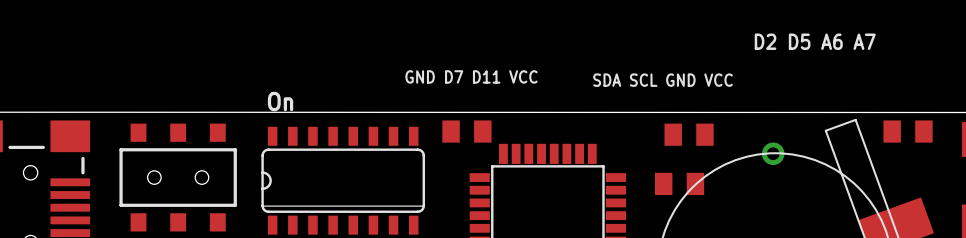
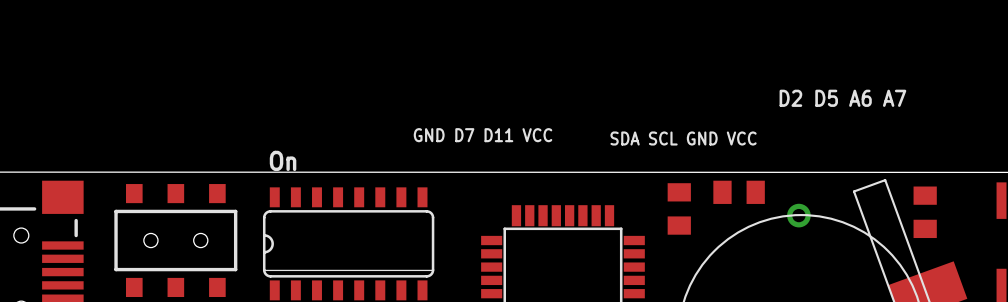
part: (466, 131) -> none
part: none -> (739, 192)
part rotation: 0° (908, 131) -> 90° clockwise (925, 212)
part: (689, 134) -> none
part: none -> (679, 208)
part: (679, 183) -> none

